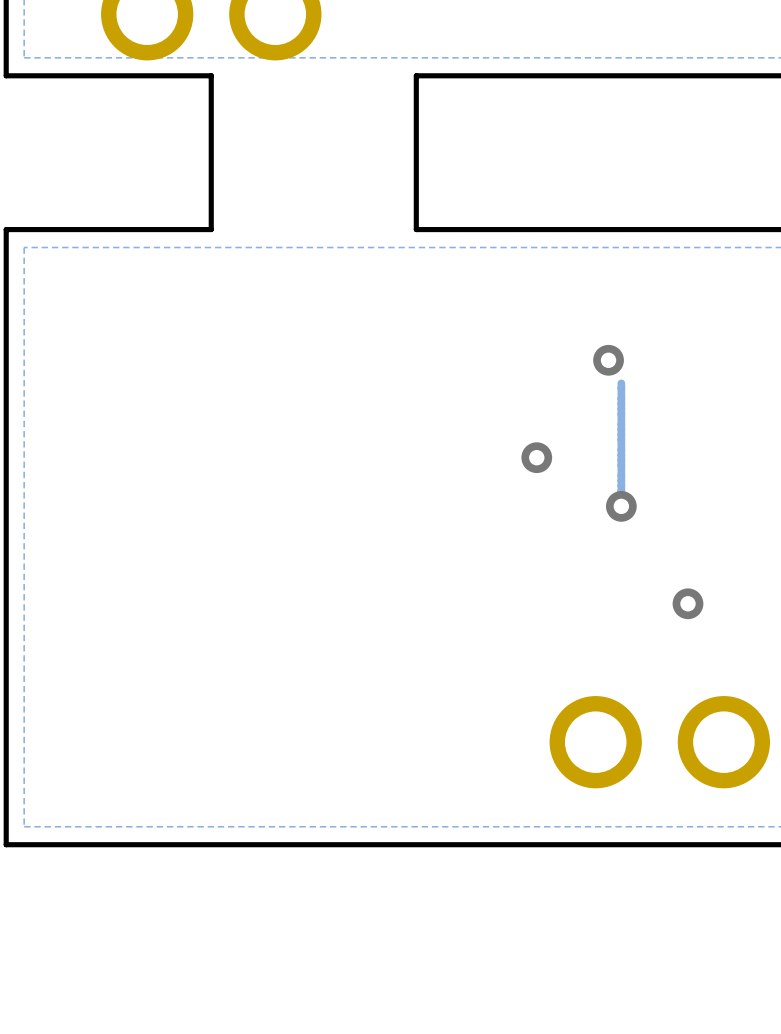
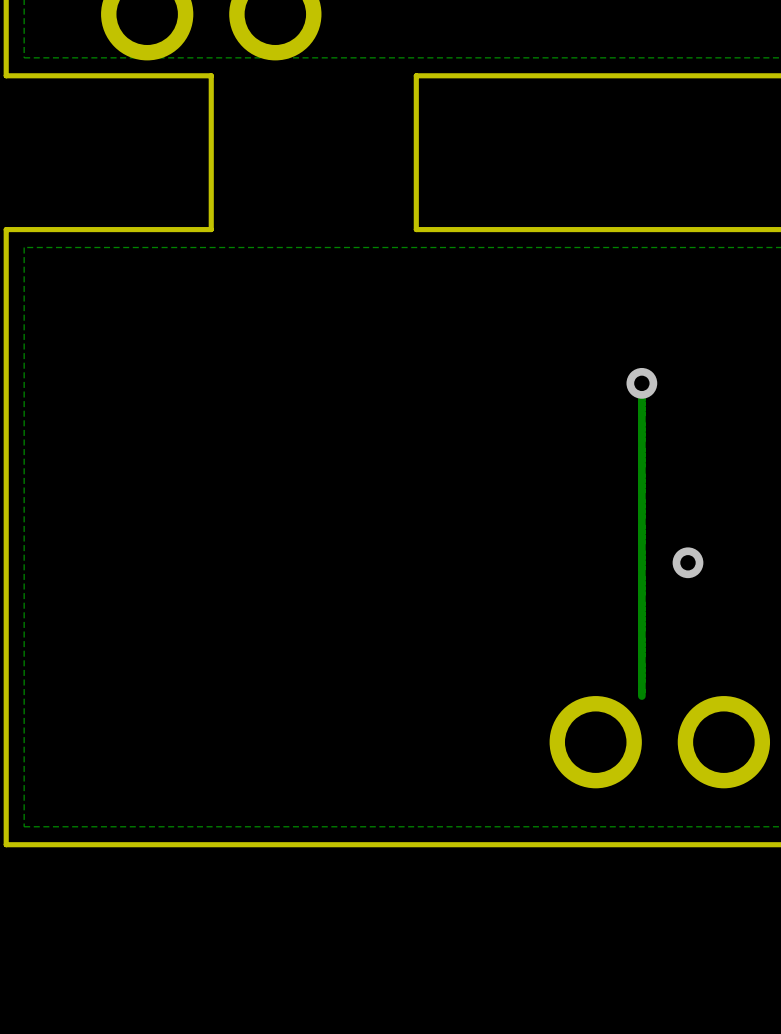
via position: (608, 360) -> (641, 383)
track: (621, 383) (621, 506) -> none
track: none -> (641, 383) (641, 696)
via: (536, 457) -> none
via: (621, 506) -> none
via position: (687, 603) -> (687, 562)

